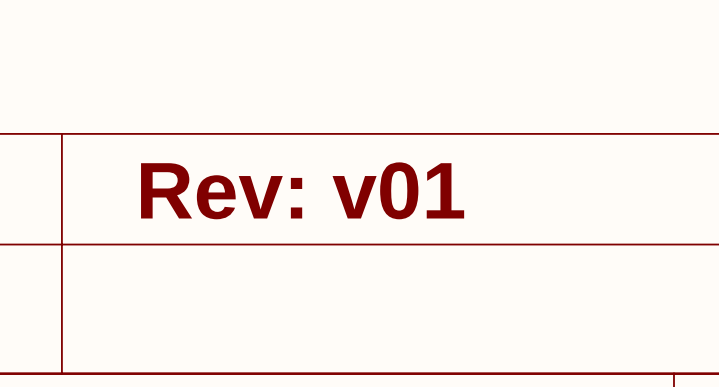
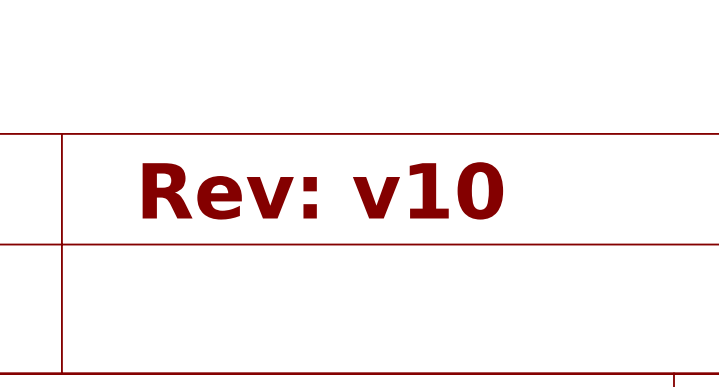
title block: Rev: v01 (302, 190) -> Rev: v10 (322, 190)

